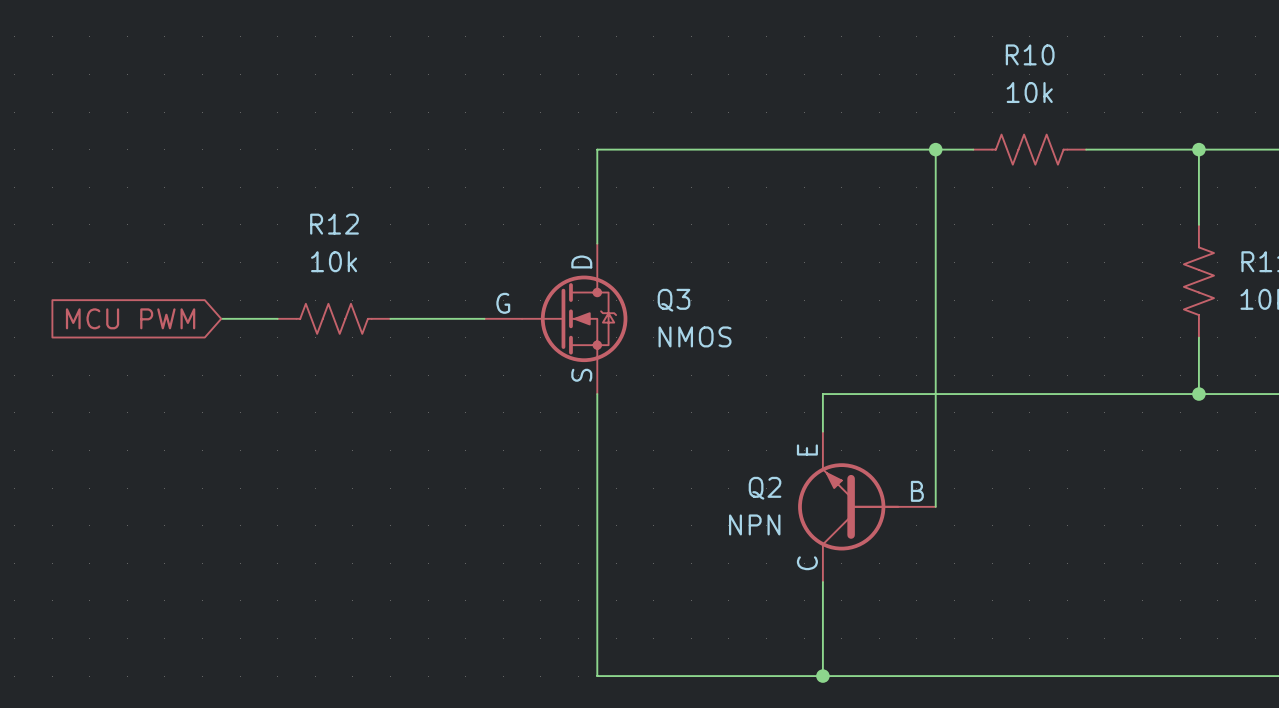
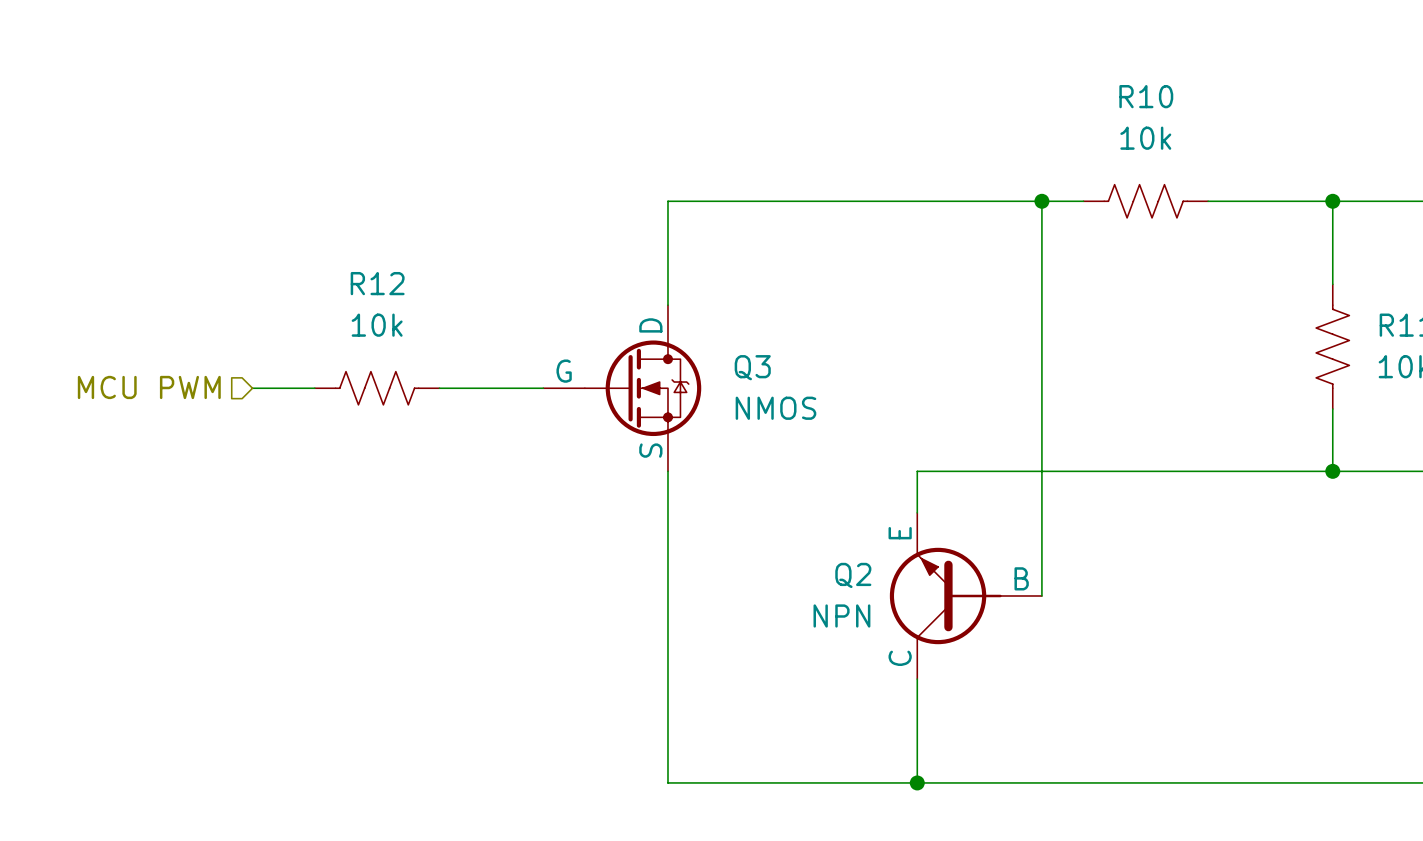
hierarchical label: none -> MCU PWM (149, 387)
global label: MCU PWM (130, 318) -> none

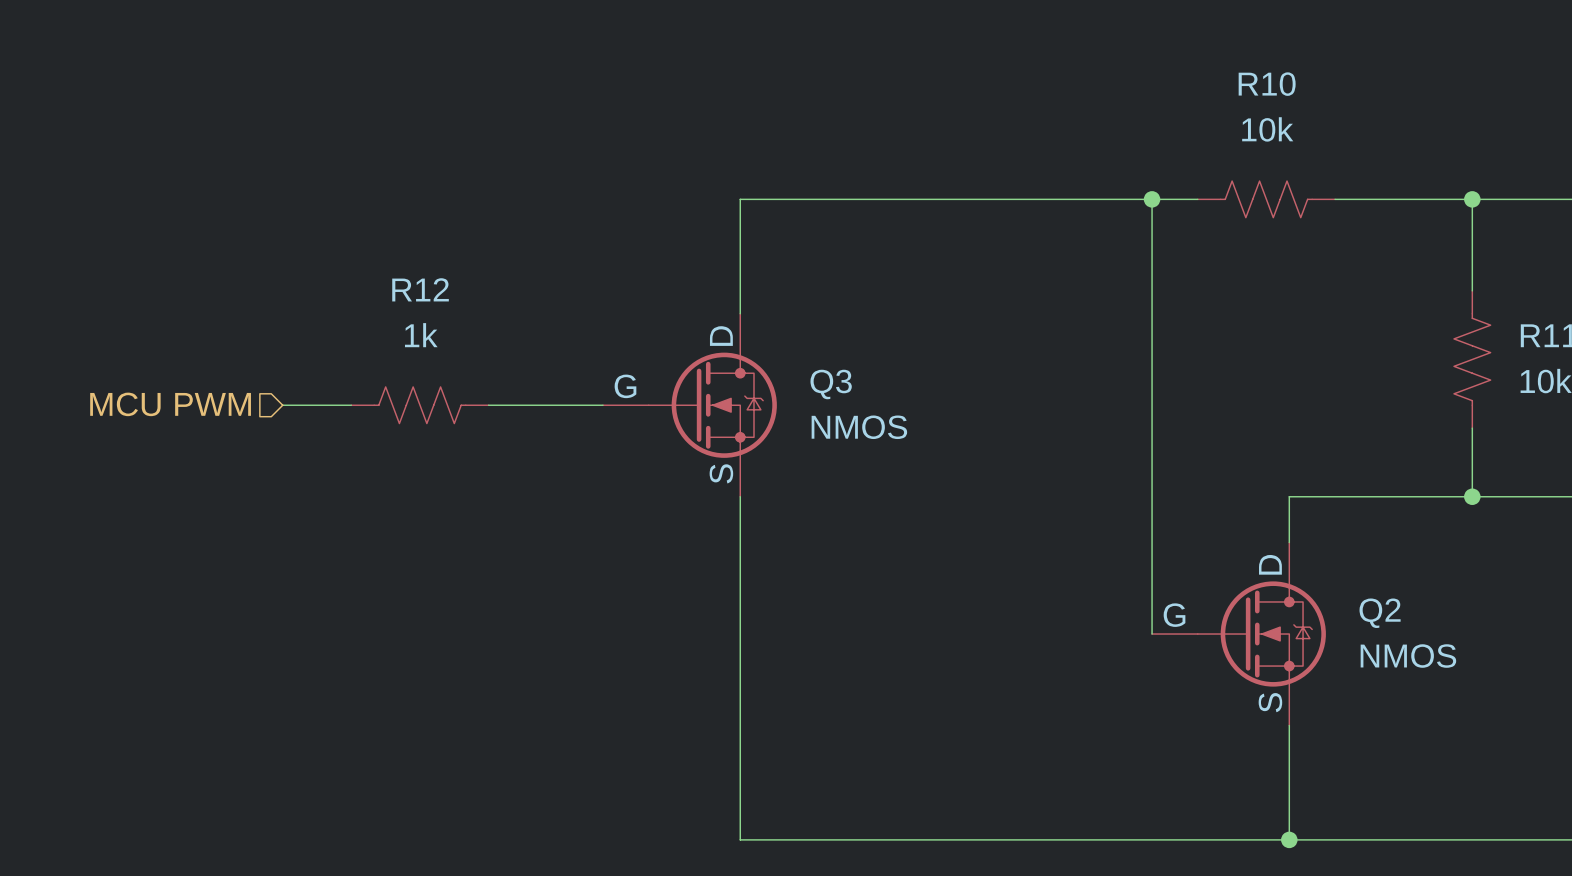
R12 value: 10k (377, 325) -> 1k (421, 335)
wire: (1166, 471) (917, 471) (917, 512) -> (1289, 496) (1289, 542)
Q2 symbol: [889, 512, 1042, 680] -> [1152, 542, 1326, 726]
Q2 name position: Q2 (853, 575) -> Q2 (1380, 613)
Q2 value: NPN (841, 615) -> NMOS (1408, 656)
wire: (917, 679) (917, 782) -> (1289, 725) (1289, 839)
junction: (917, 782) -> none
junction: none -> (1289, 839)

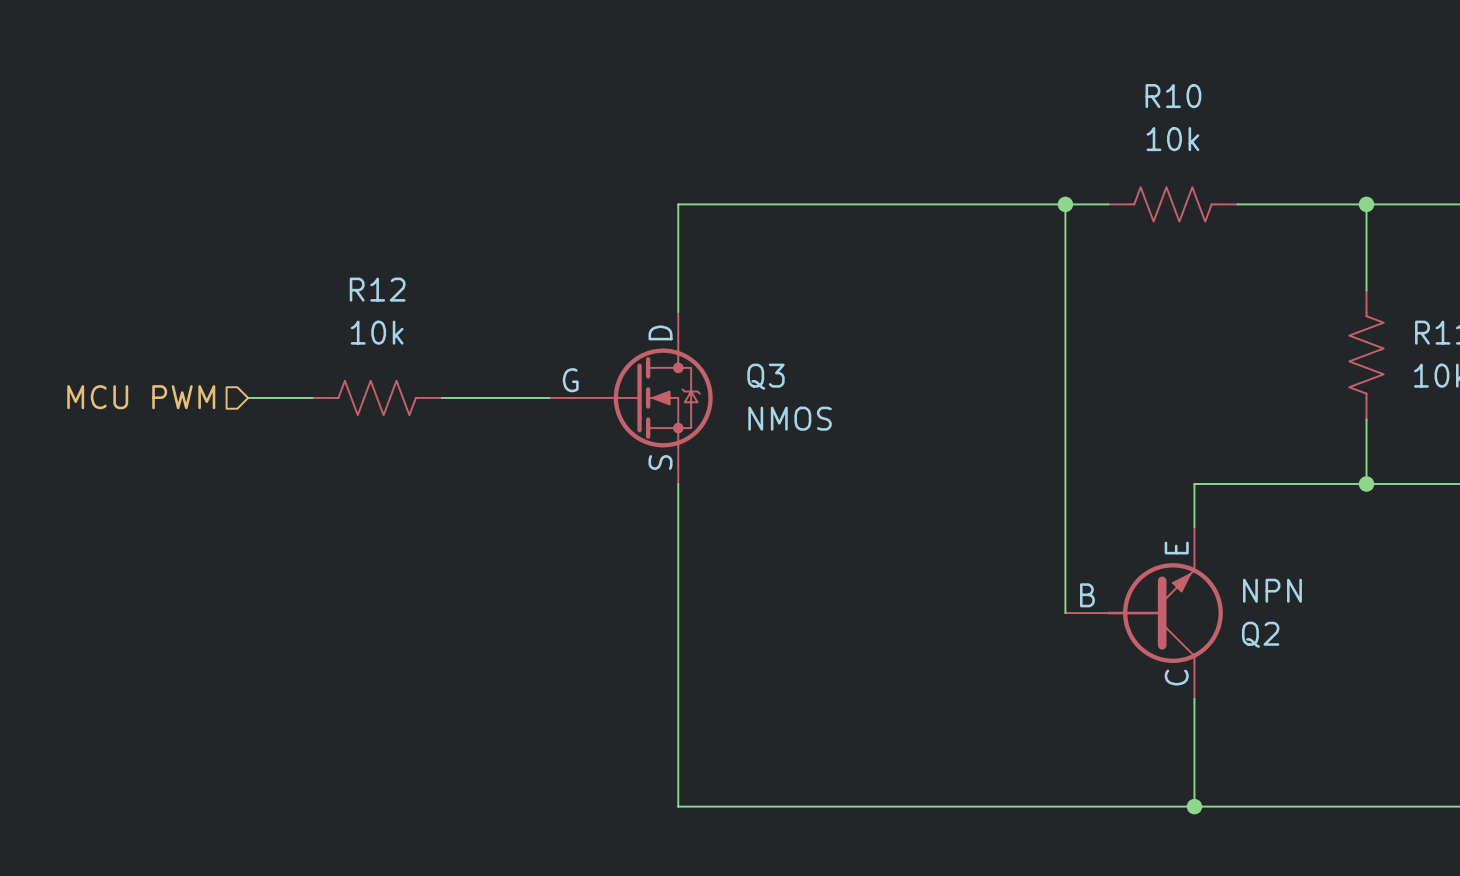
R12 value: 1k (421, 335) -> 10k (377, 332)
Q2 symbol: [1152, 542, 1326, 726] -> [1065, 527, 1223, 700]
Q2 name position: Q2 (1380, 613) -> Q2 (1260, 634)
Q2 value: NMOS (1408, 656) -> NPN (1272, 590)

